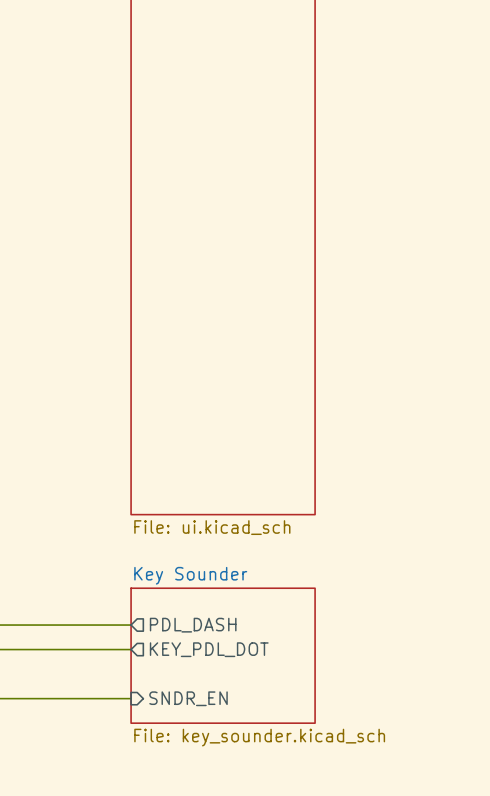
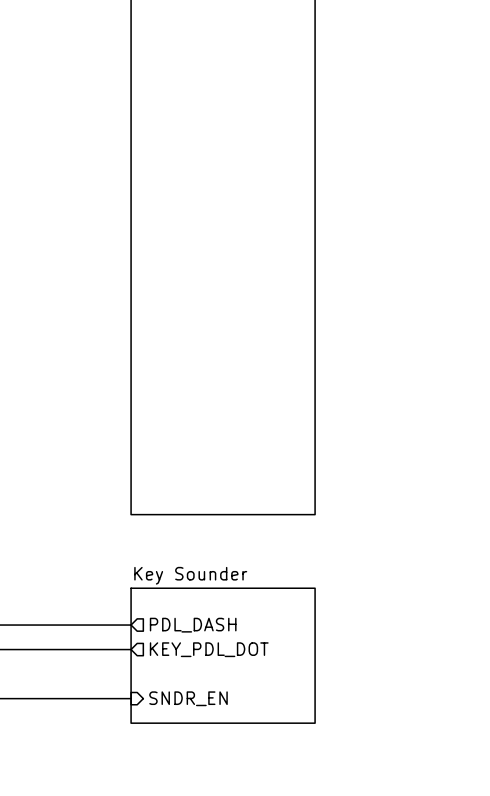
sheet value: File: ui.kicad_sch (212, 527) -> none
sheet Key Sounder value: File: key_sounder.kicad_sch (259, 737) -> none

